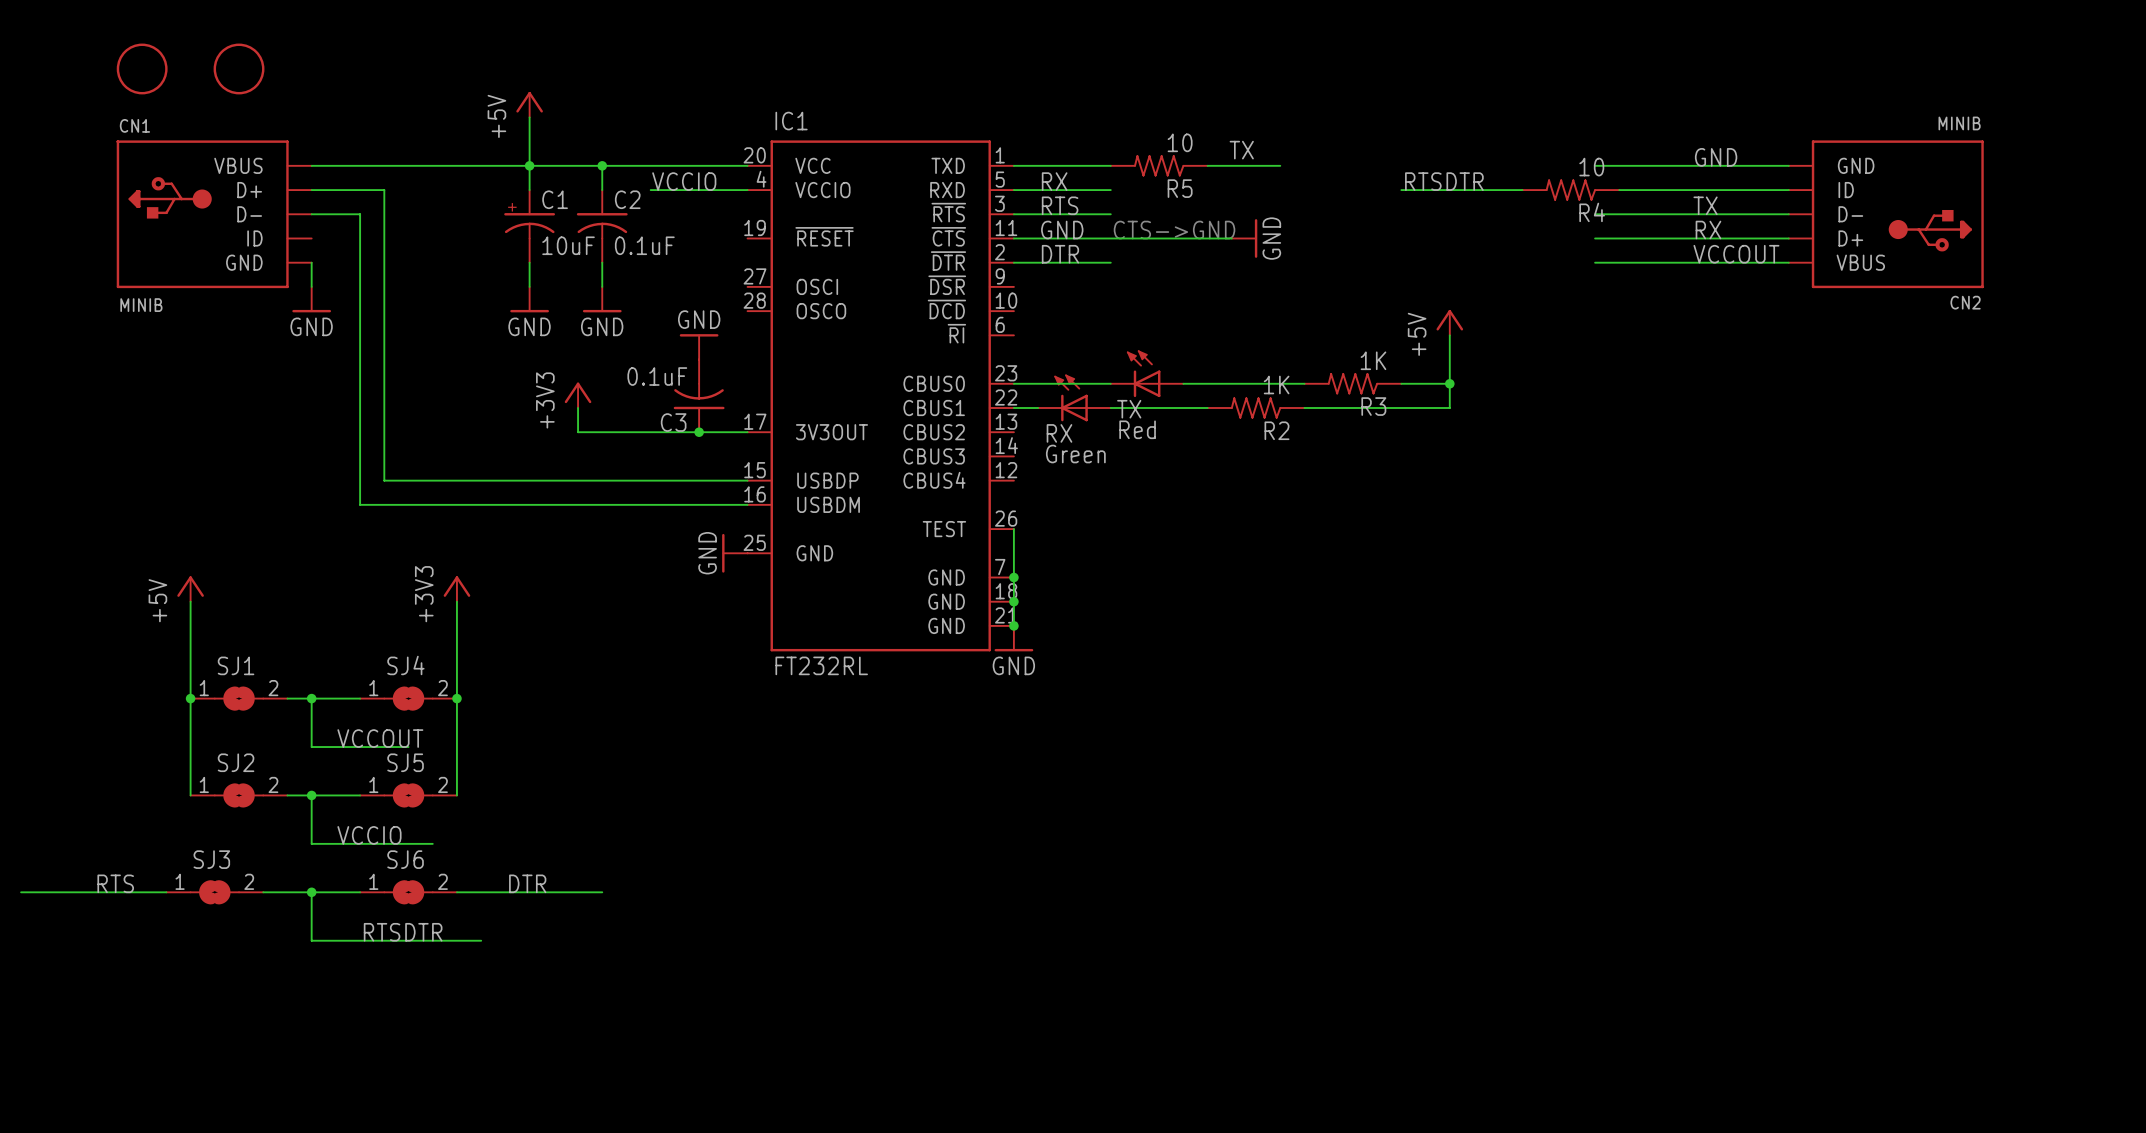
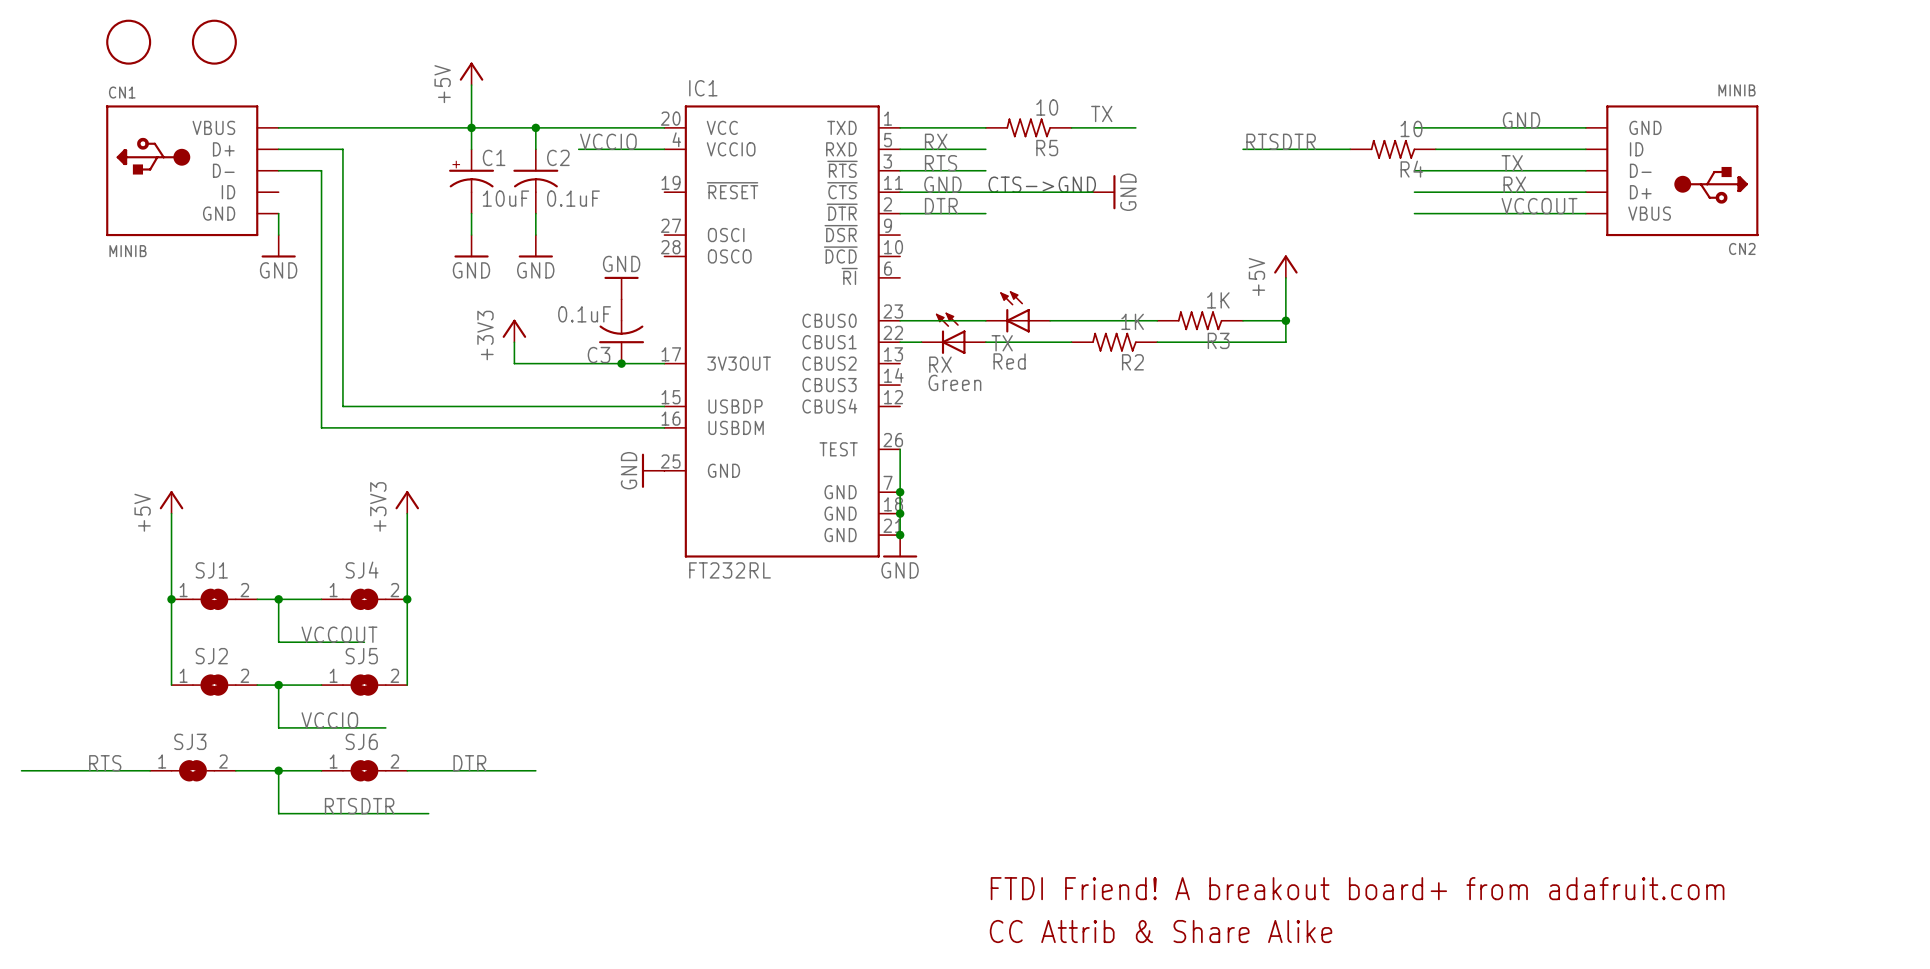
text: none -> FTDI Friend! A breakout board+ from adafruit.com (1357, 888)
text: none -> CC Attrib & Share Alike (1161, 931)

